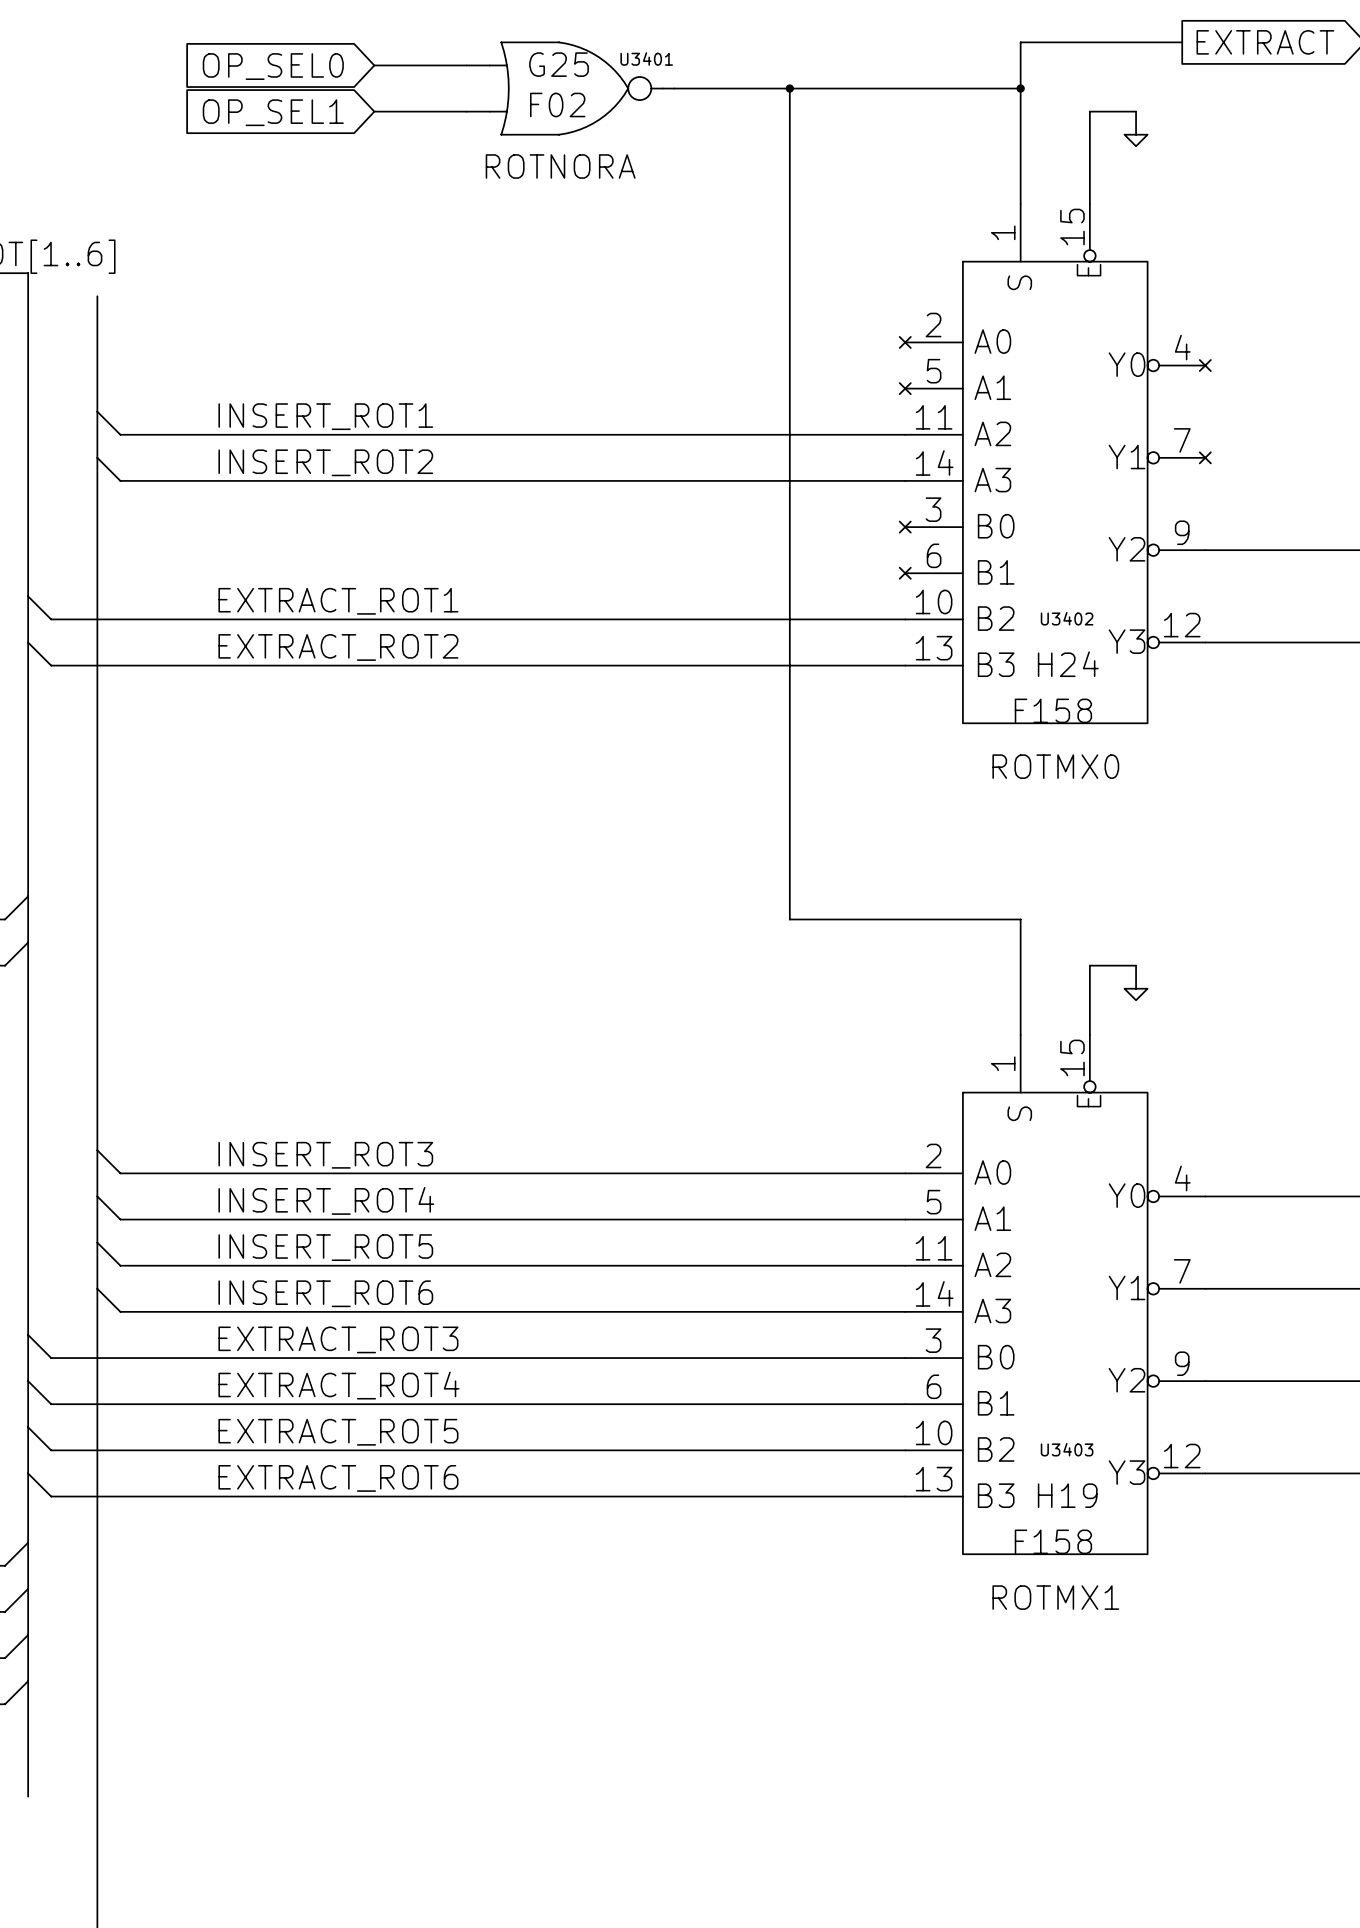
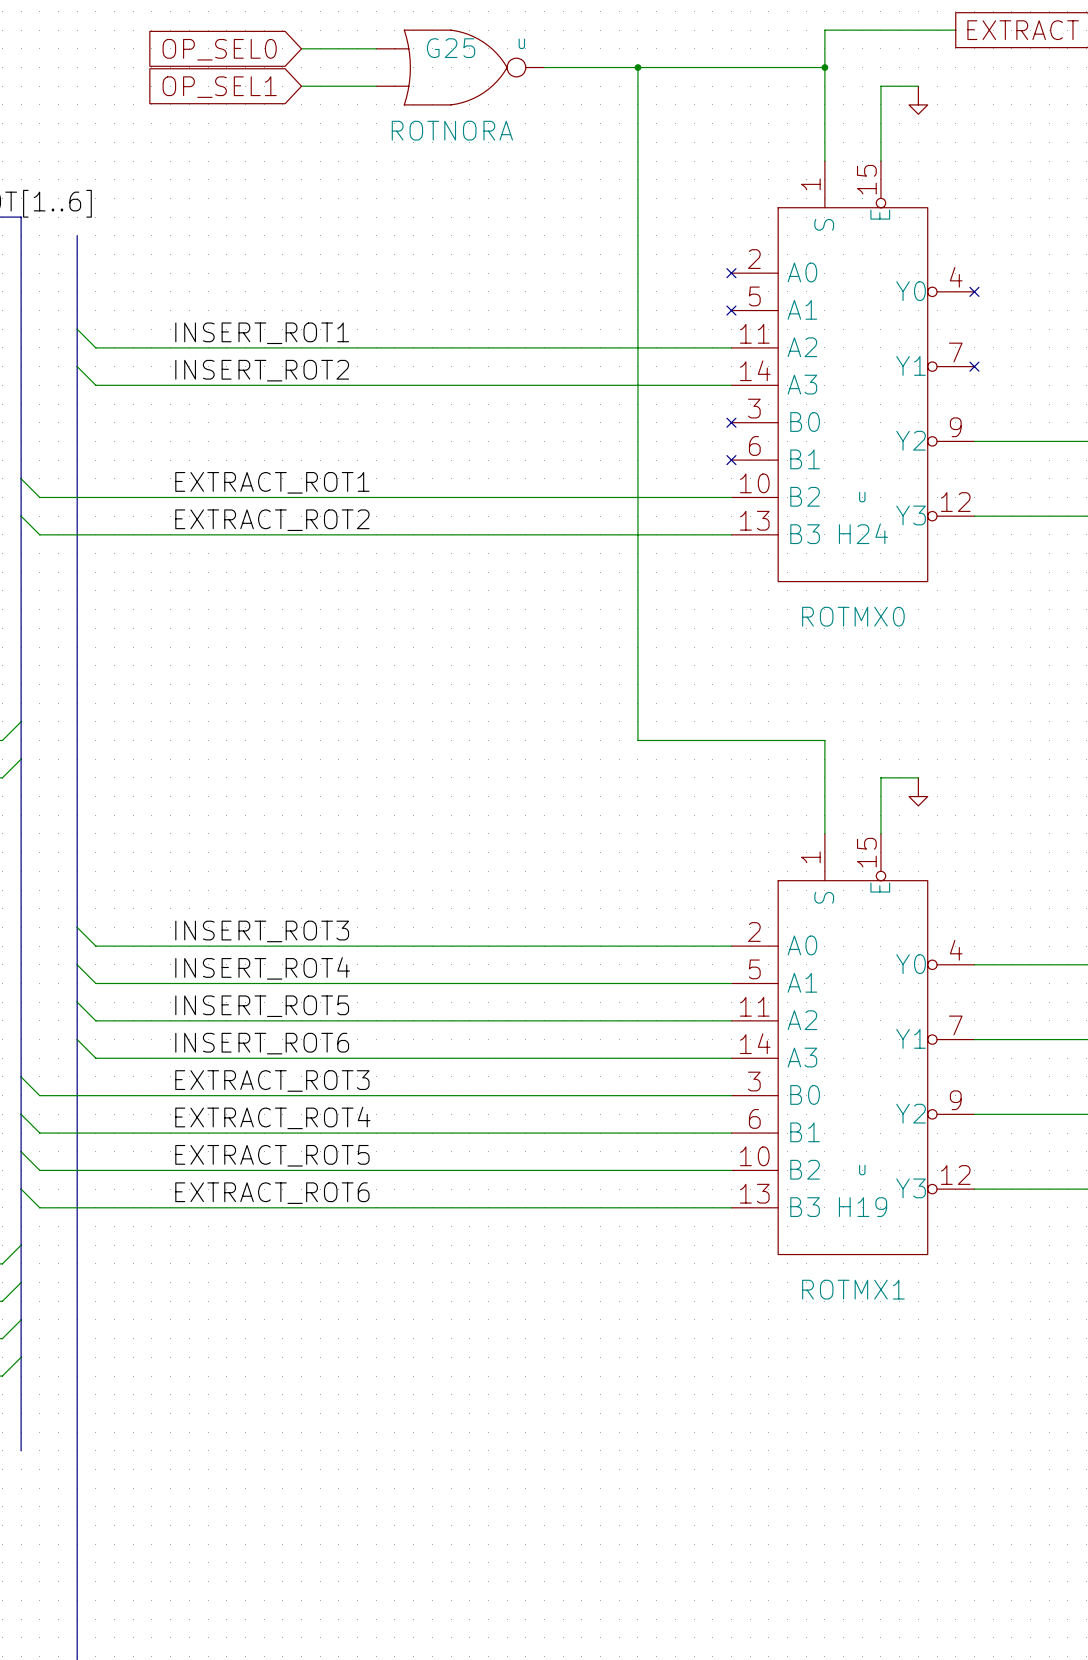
U3401 name: U3401 (646, 58) -> U (521, 43)
U3401 value: F02 (557, 104) -> none
U3402 name: U3402 (1067, 618) -> U (862, 497)
U3402 value: F158 (1053, 710) -> none
U3403 name: U3403 (1067, 1449) -> U (862, 1170)
U3403 value: F158 (1053, 1541) -> none

